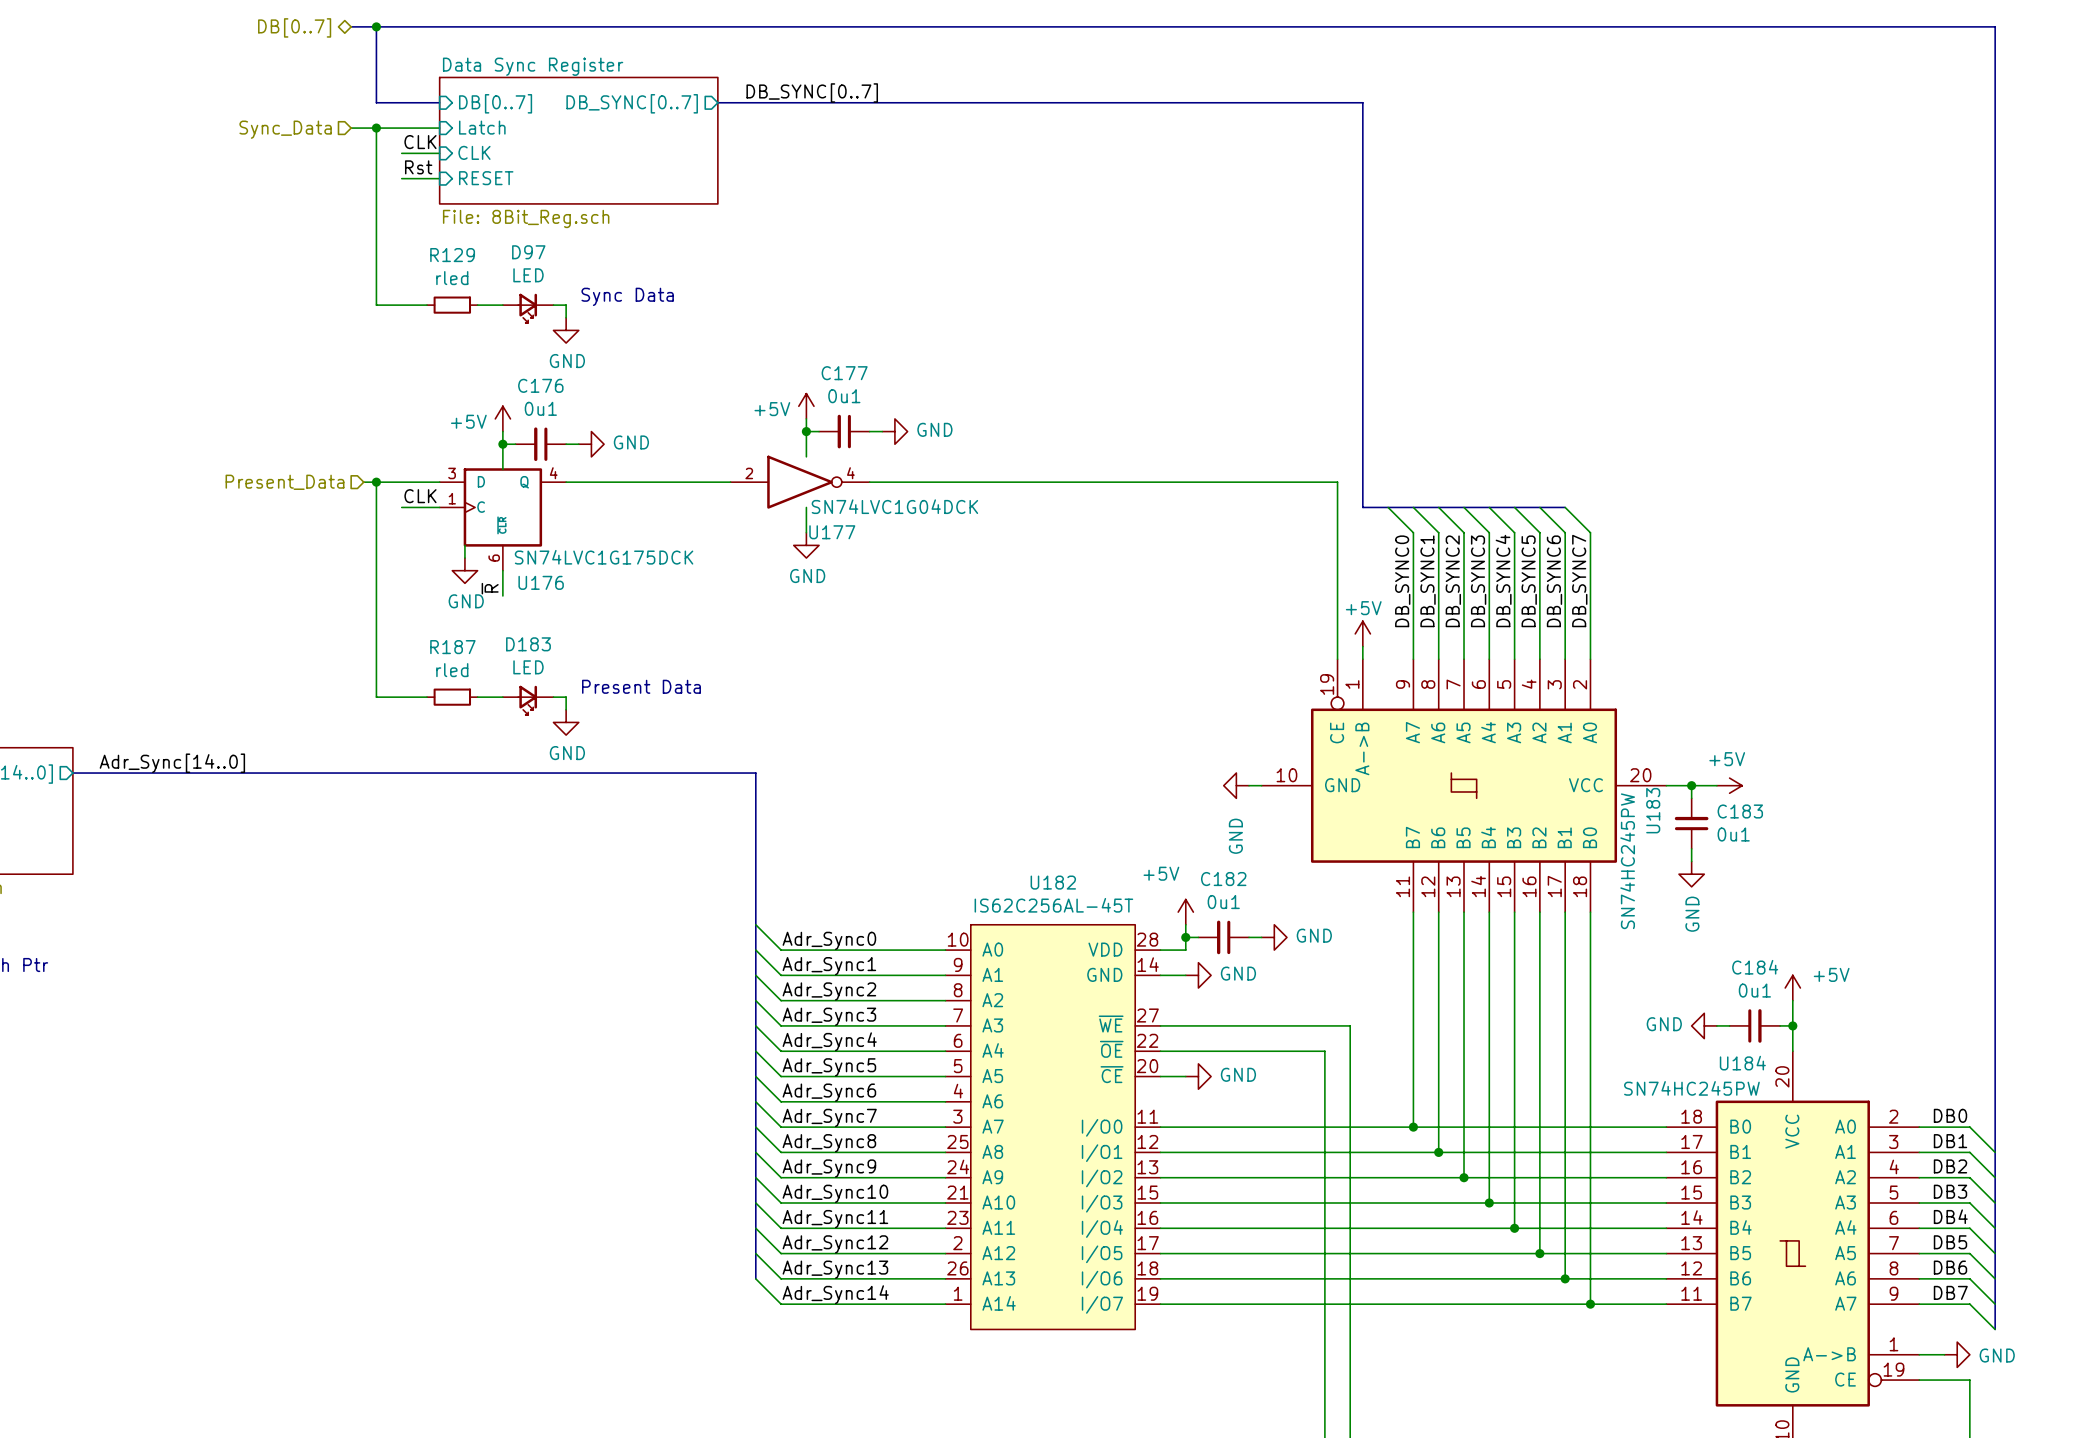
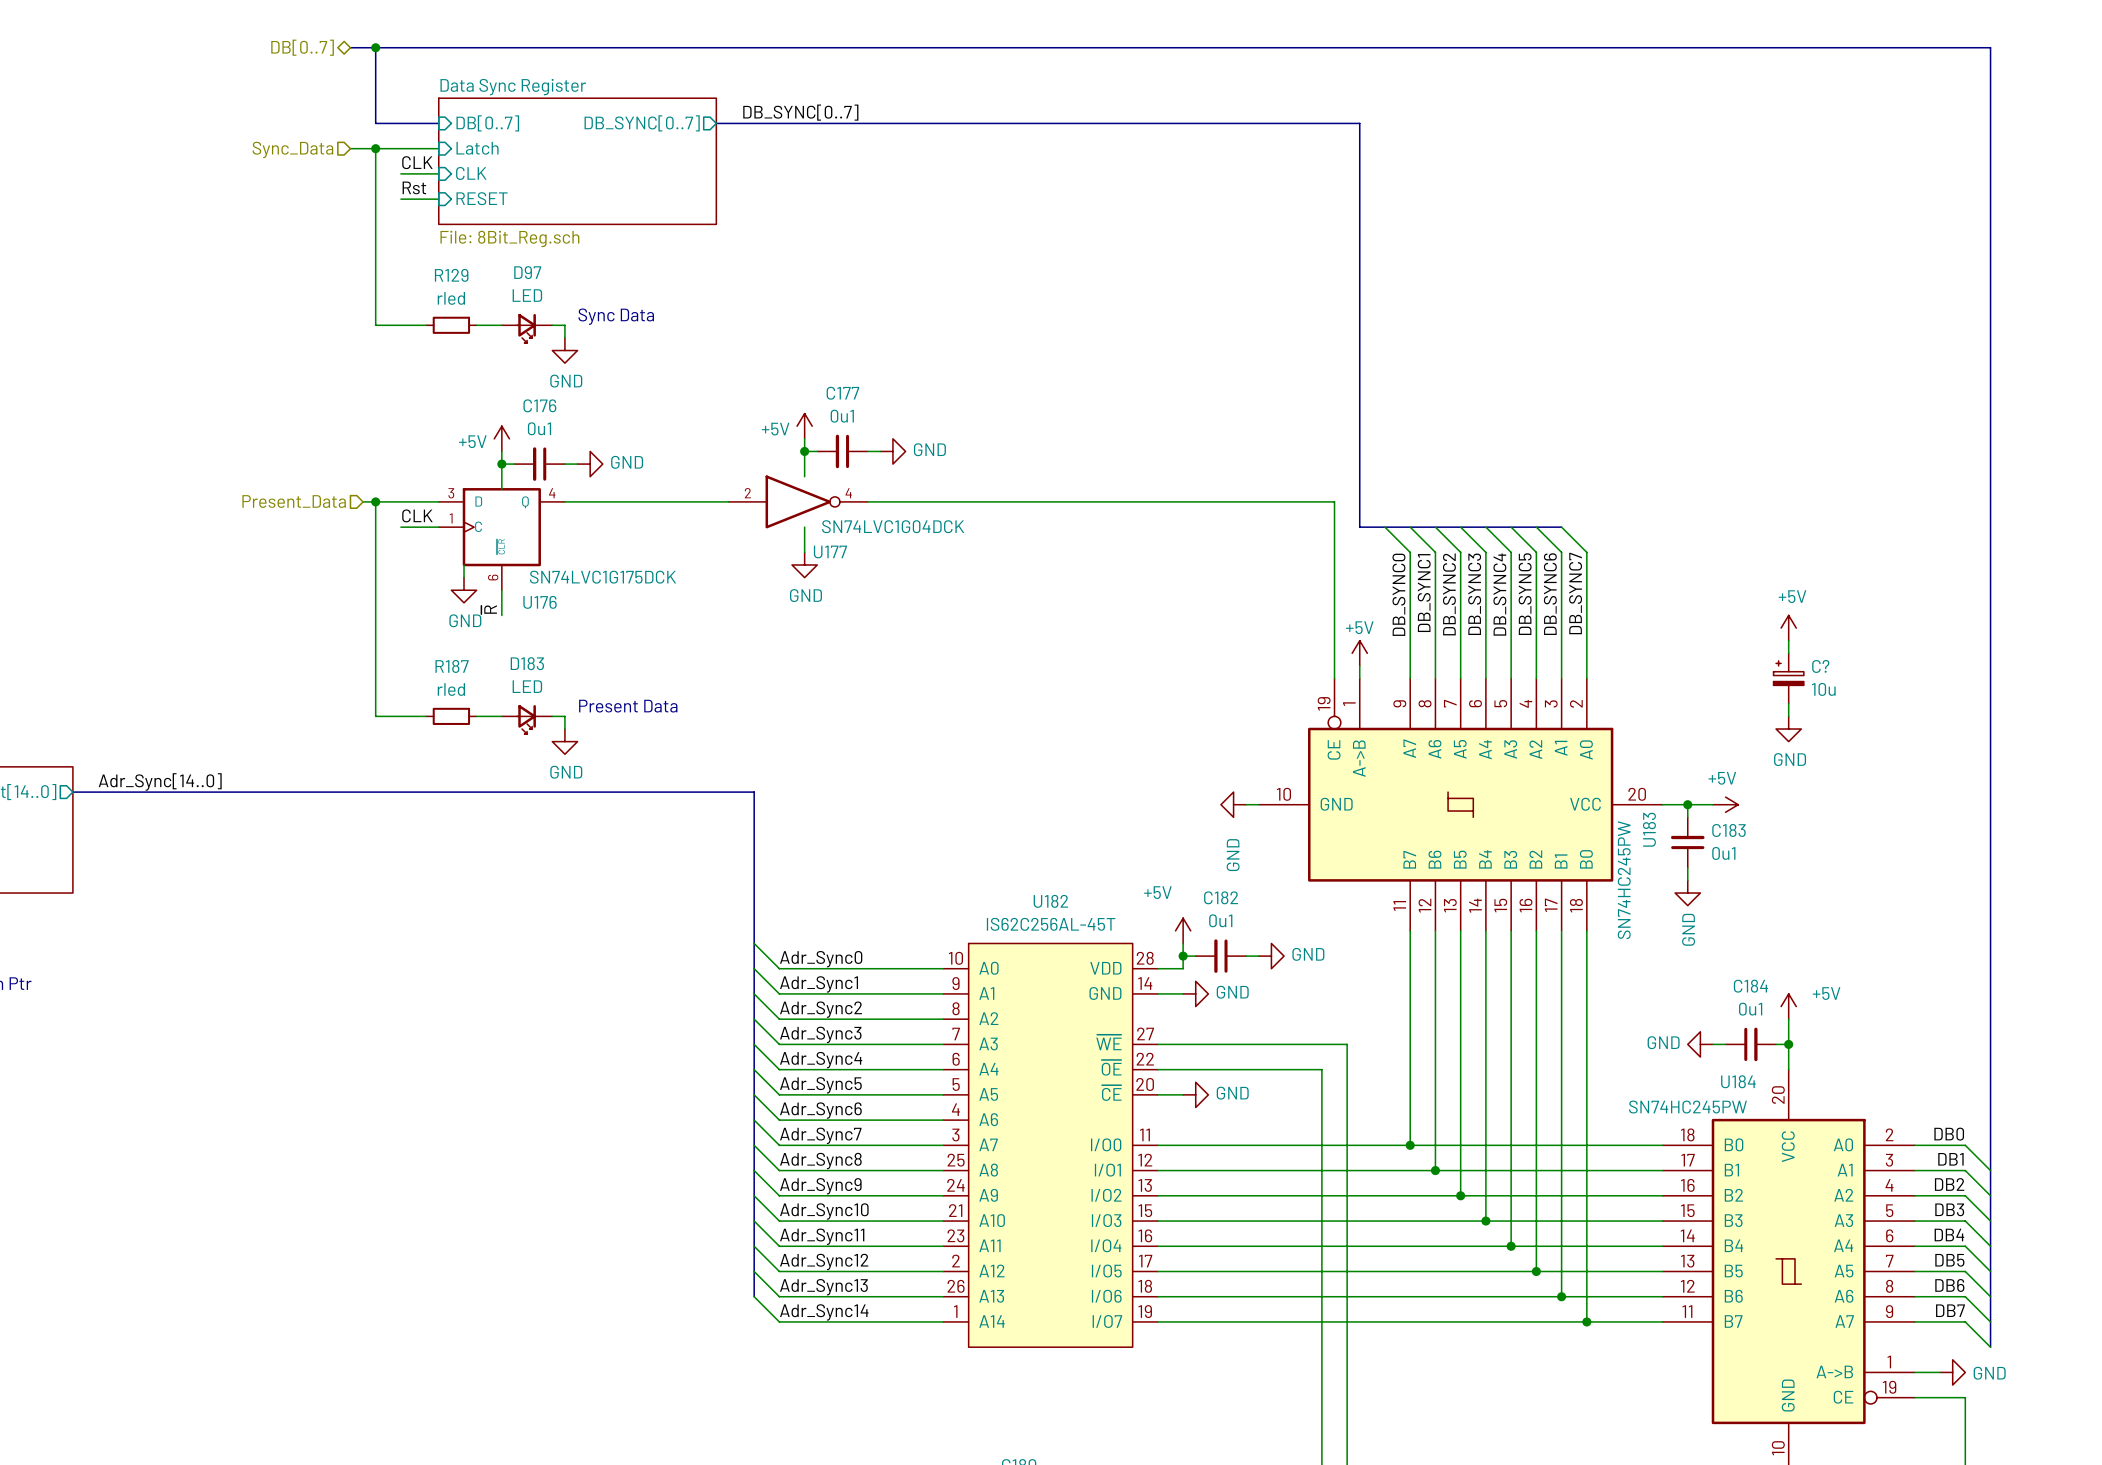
power symbol: none -> +5V (1788, 628)
wire: none -> (1788, 640) (1788, 653)
C?: none -> 10u (1788, 678)
wire: none -> (1788, 703) (1788, 716)
power symbol: none -> GND (1788, 729)

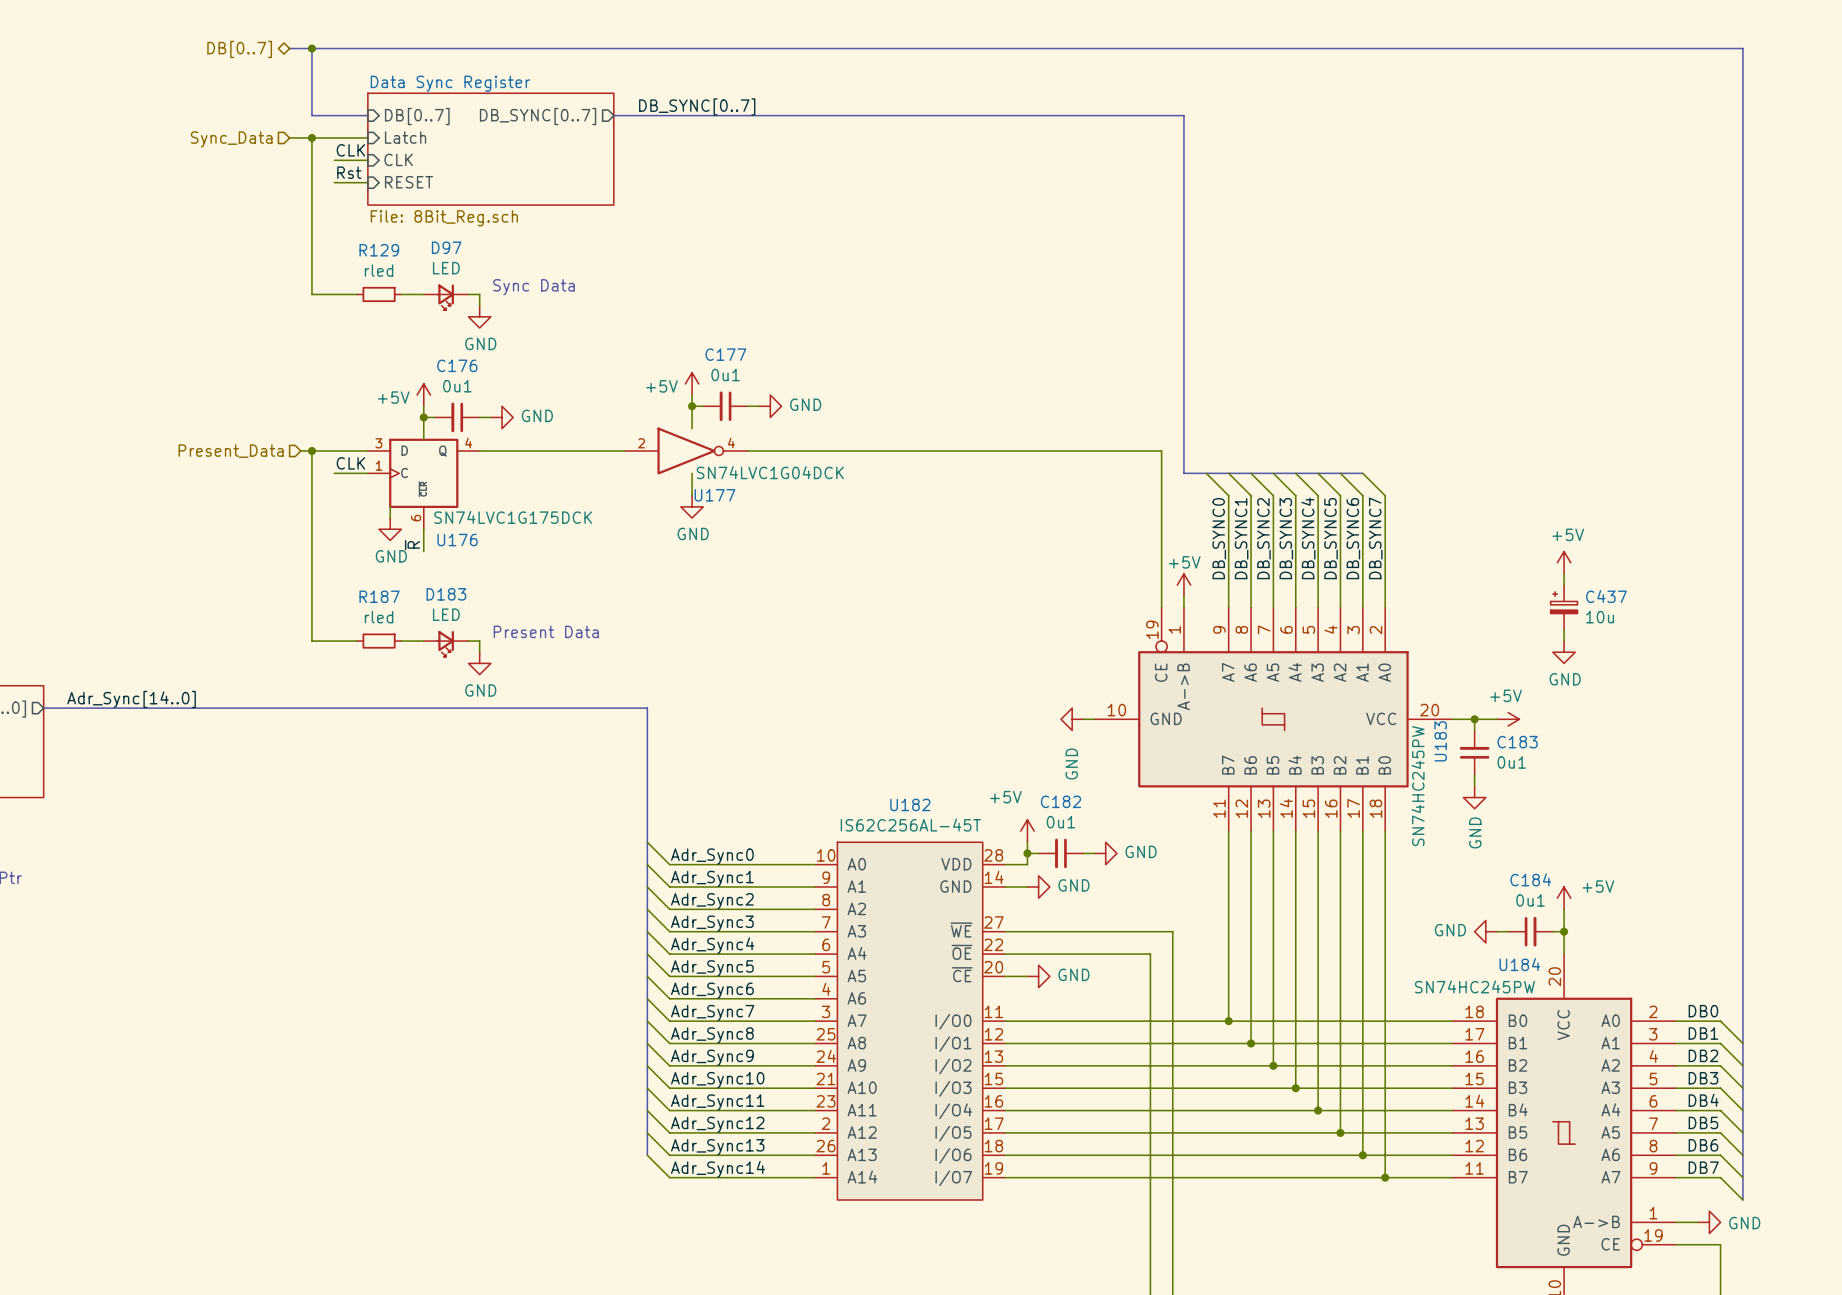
C? name: C? (1820, 666) -> C437 (1606, 596)

